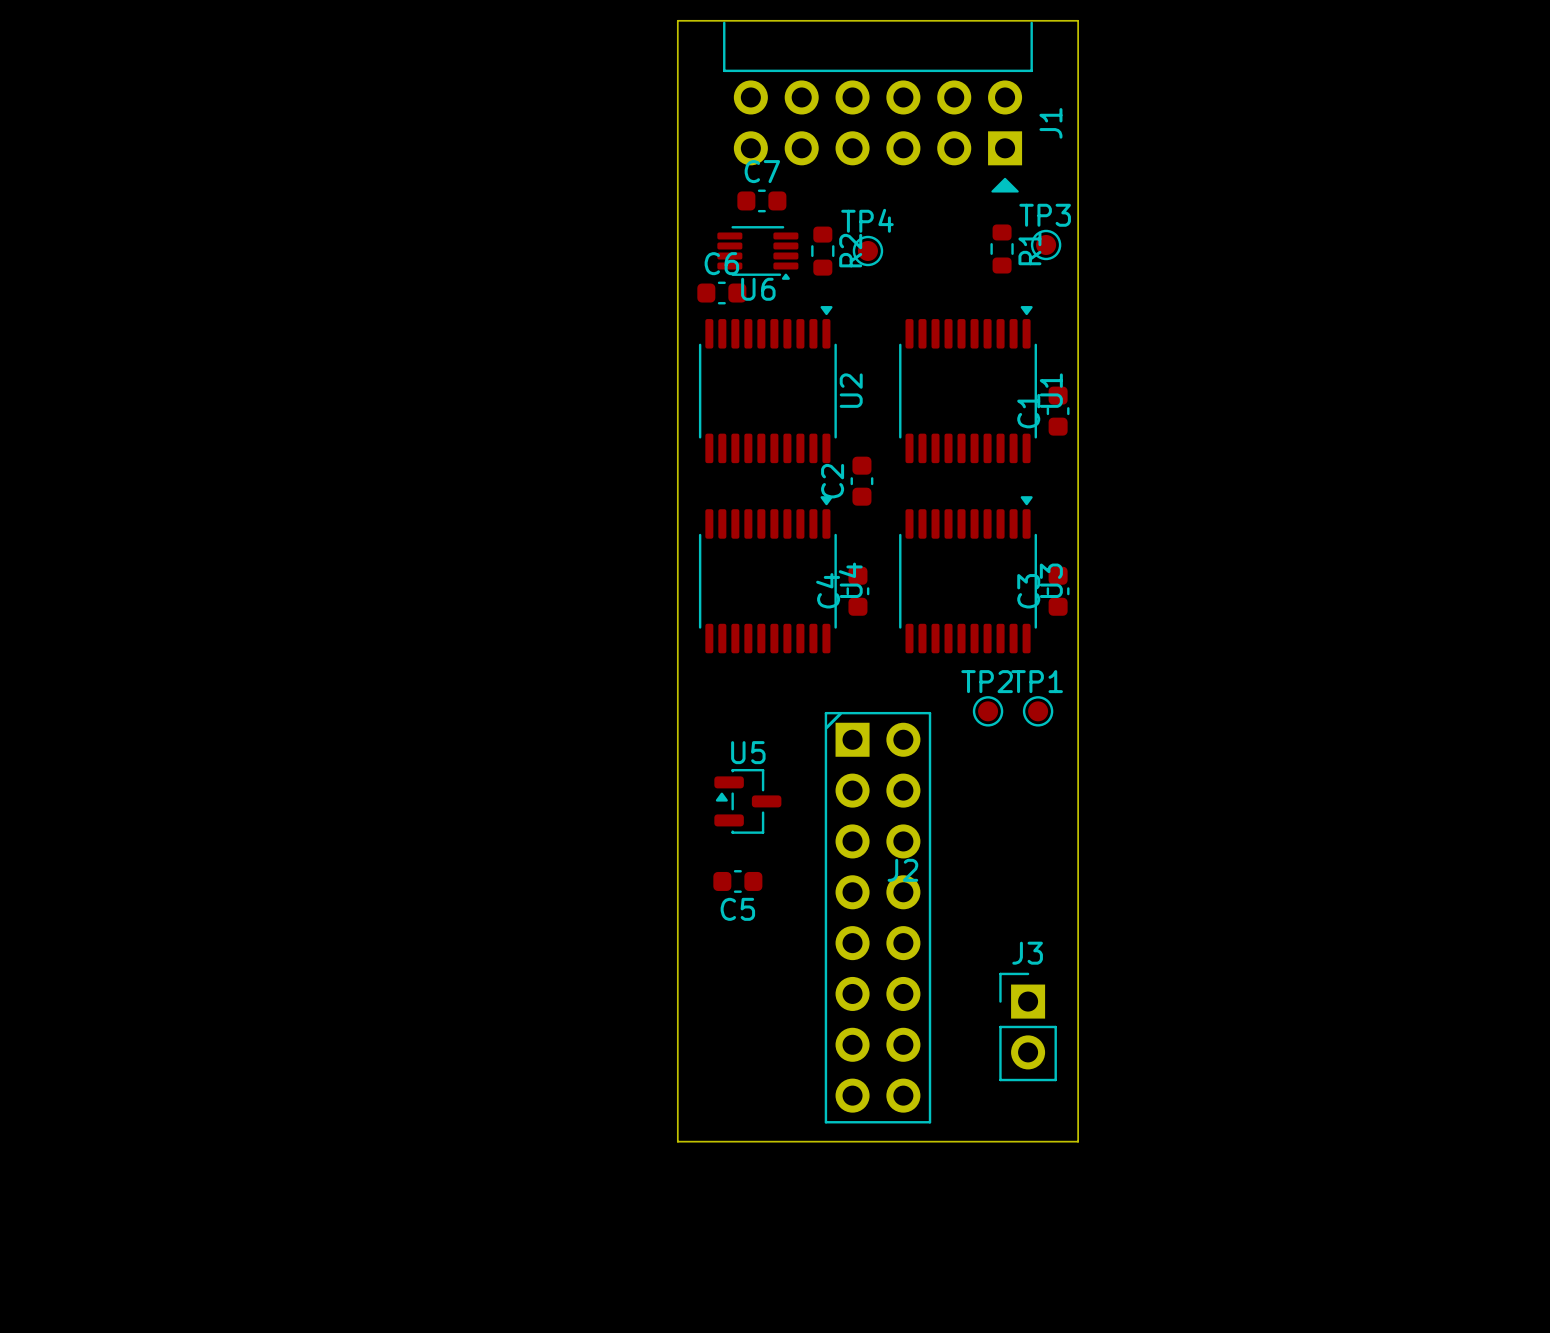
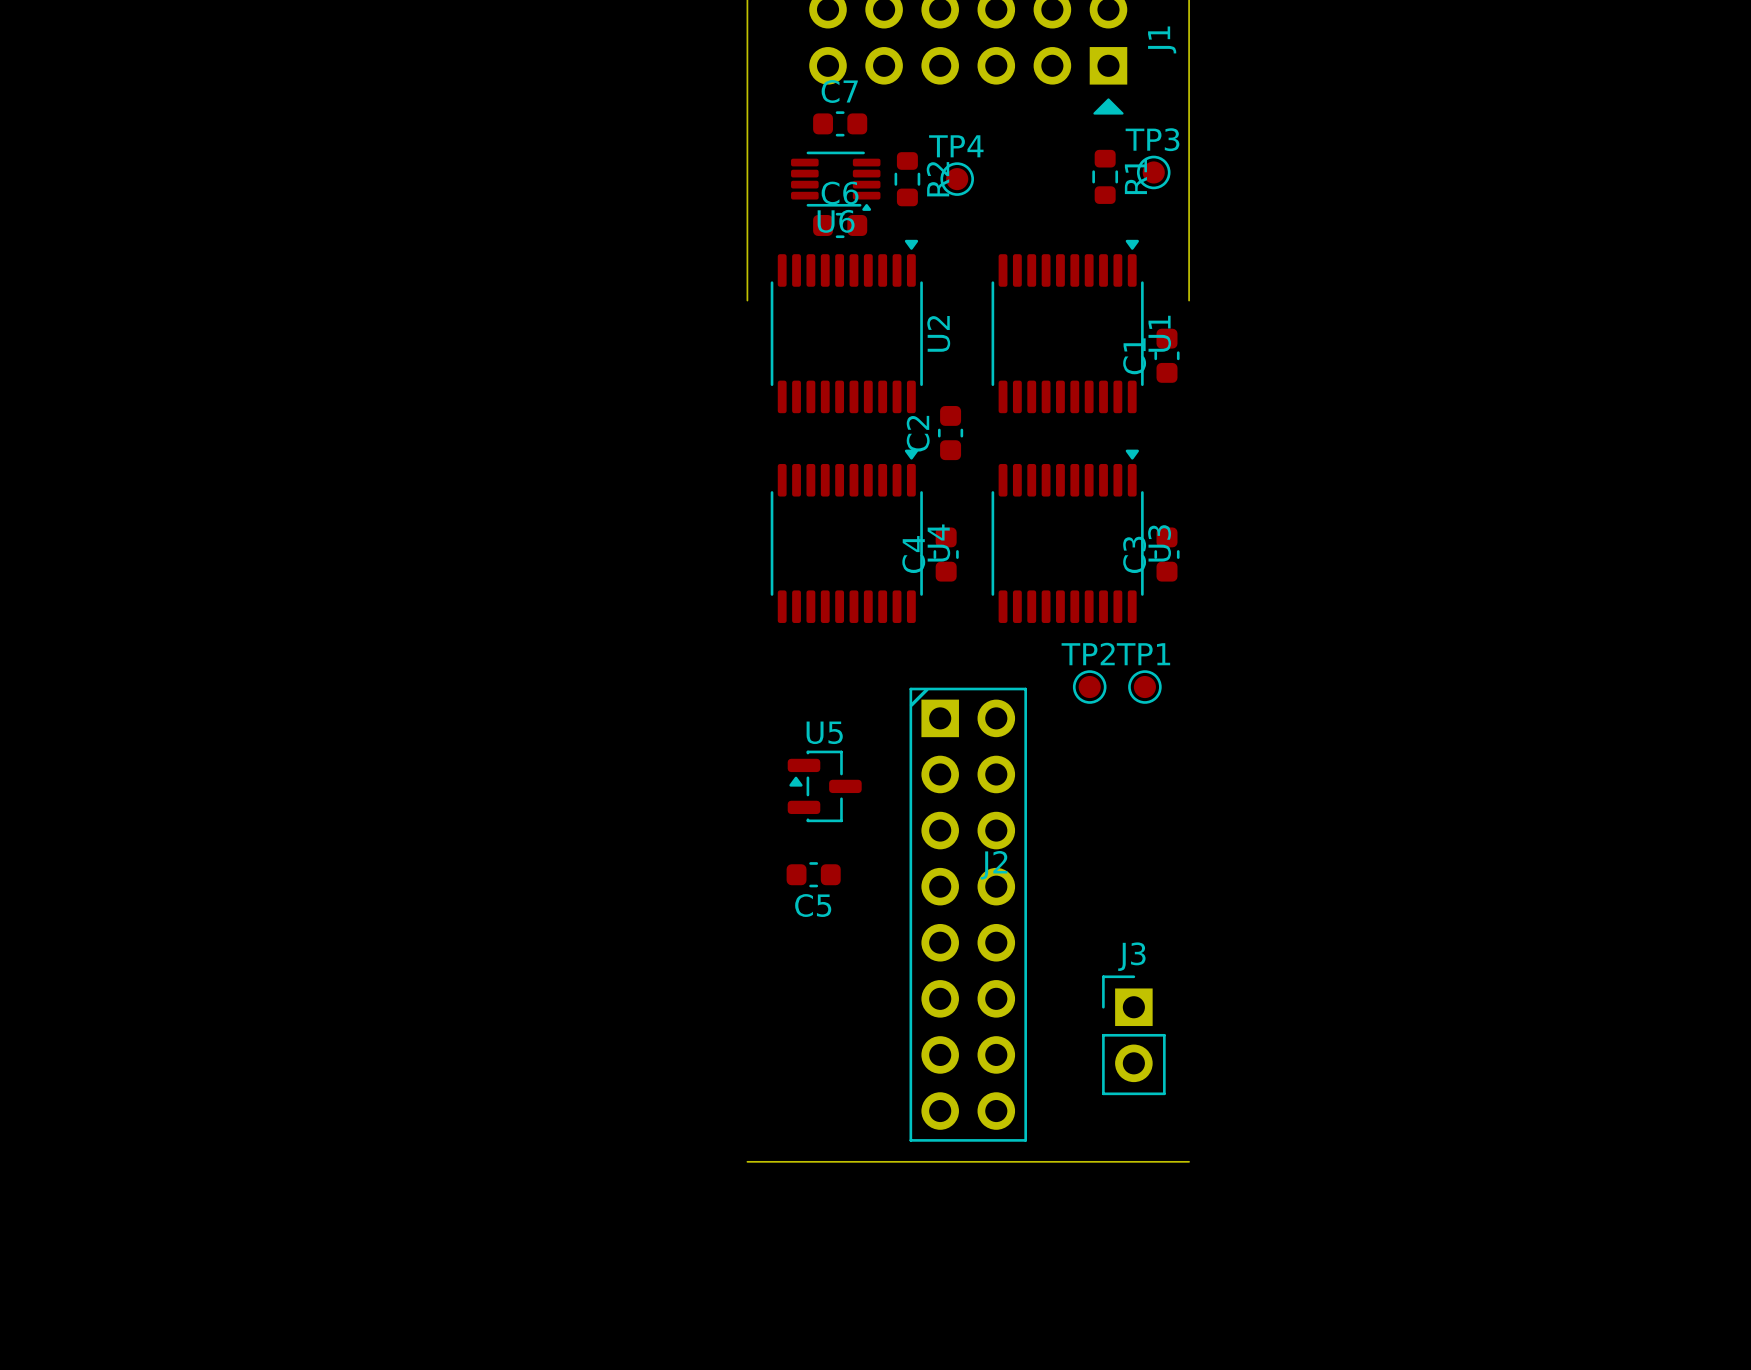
C6 position: (721, 293) -> (840, 225)
board edge: (677, 361) (677, 1141) -> none
board edge: (1078, 361) (1078, 1141) -> none

